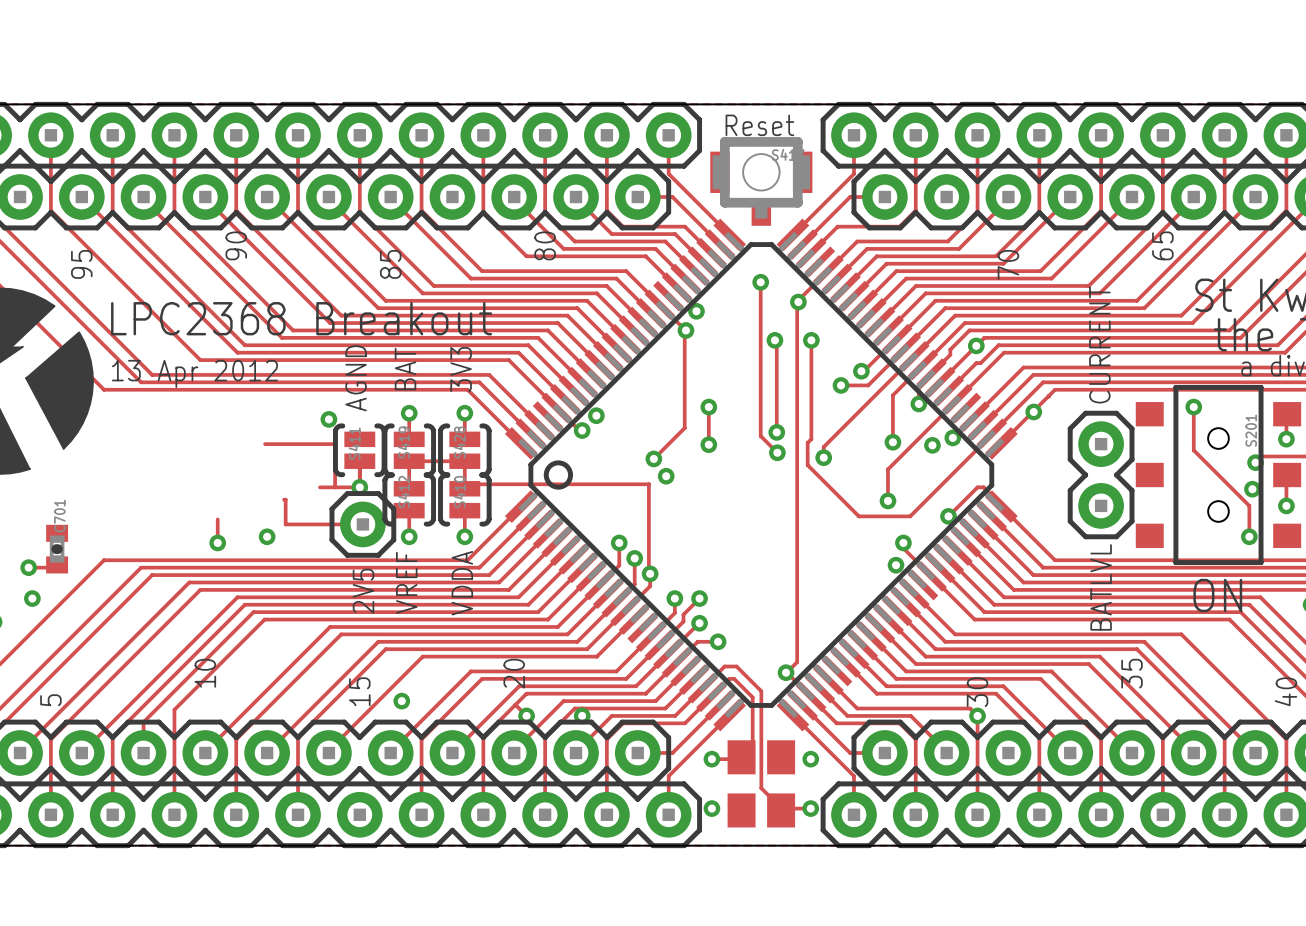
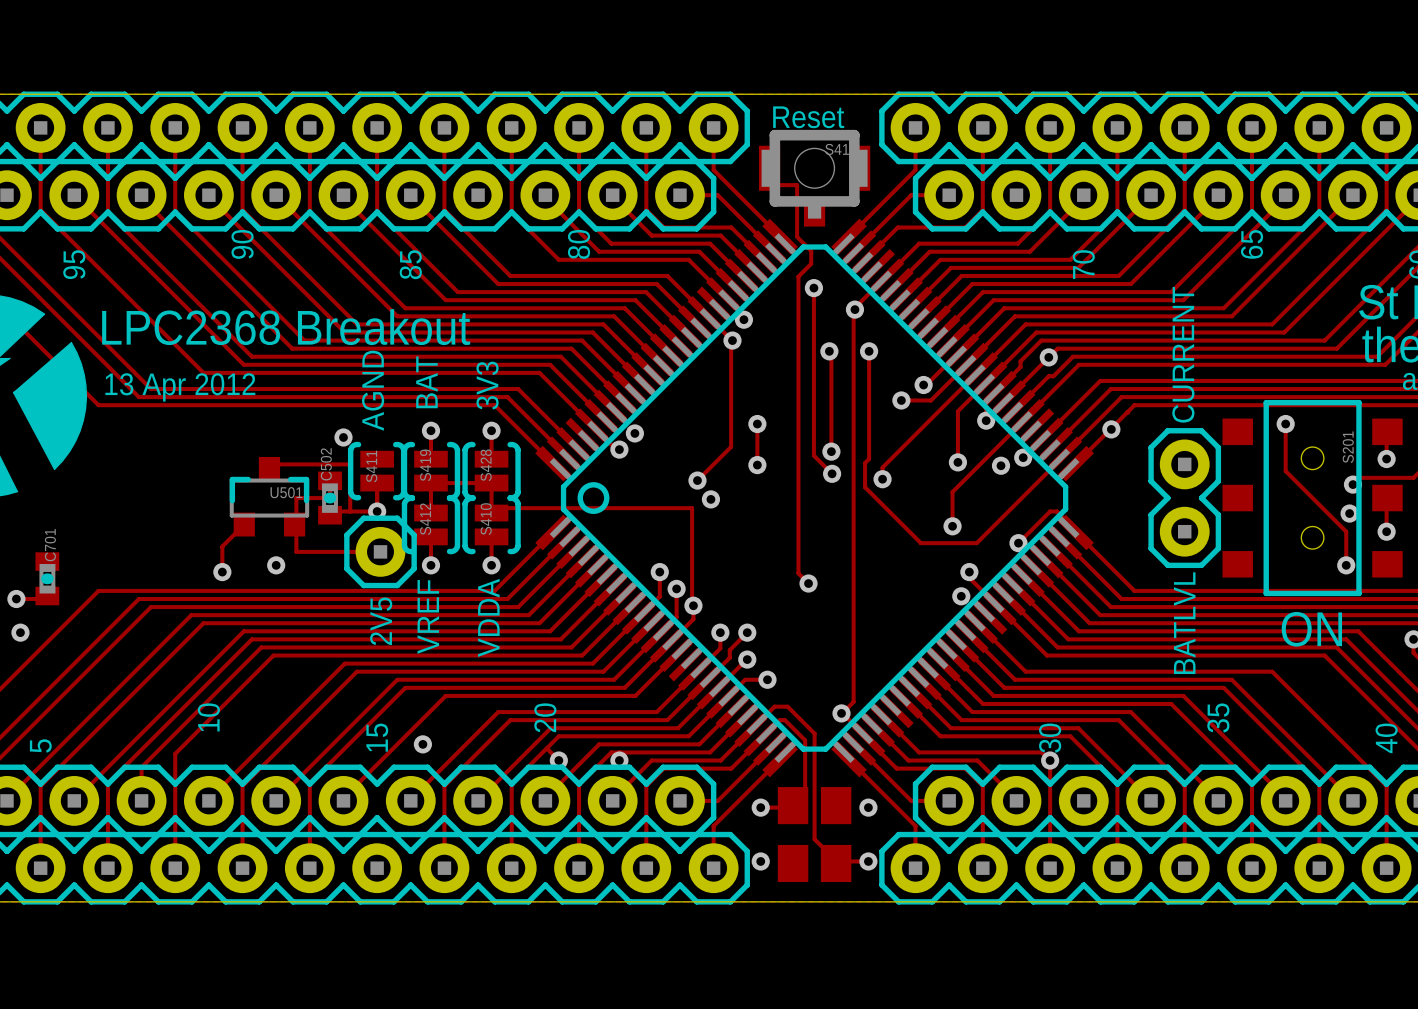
track: none -> (770, 168) (769, 185) (797, 185) (797, 236) (811, 251) (811, 263) (798, 276) (798, 573) (808, 583)
track: none -> (330, 477) (330, 498) (296, 498) (296, 522) (294, 524)
U501: none -> (269, 496)
C502: none -> (330, 498)
track: none -> (244, 524) (222, 546)
via: none -> (808, 583)

